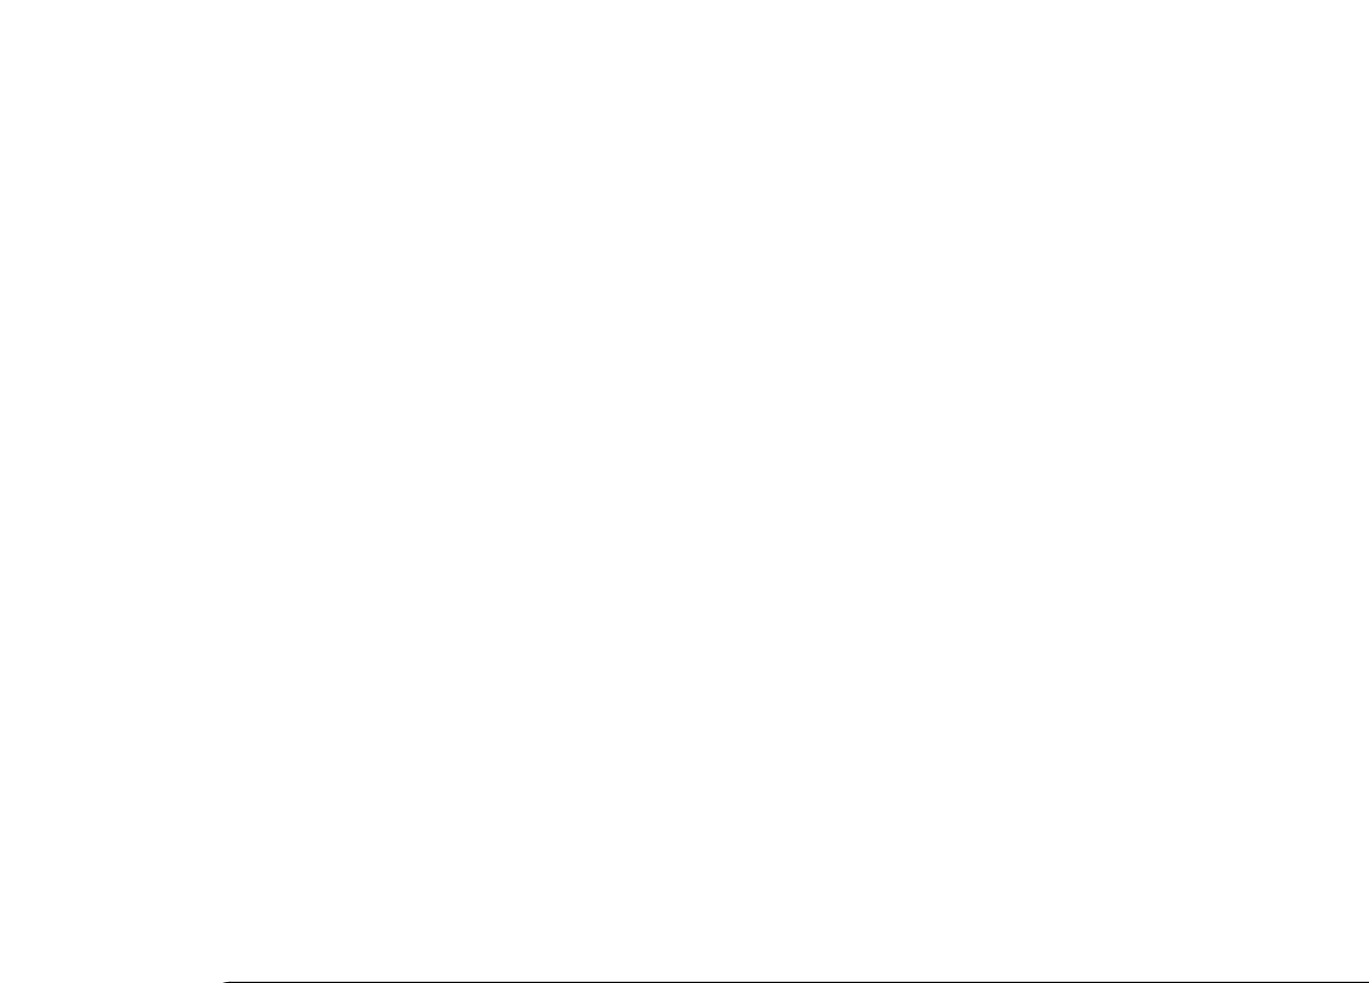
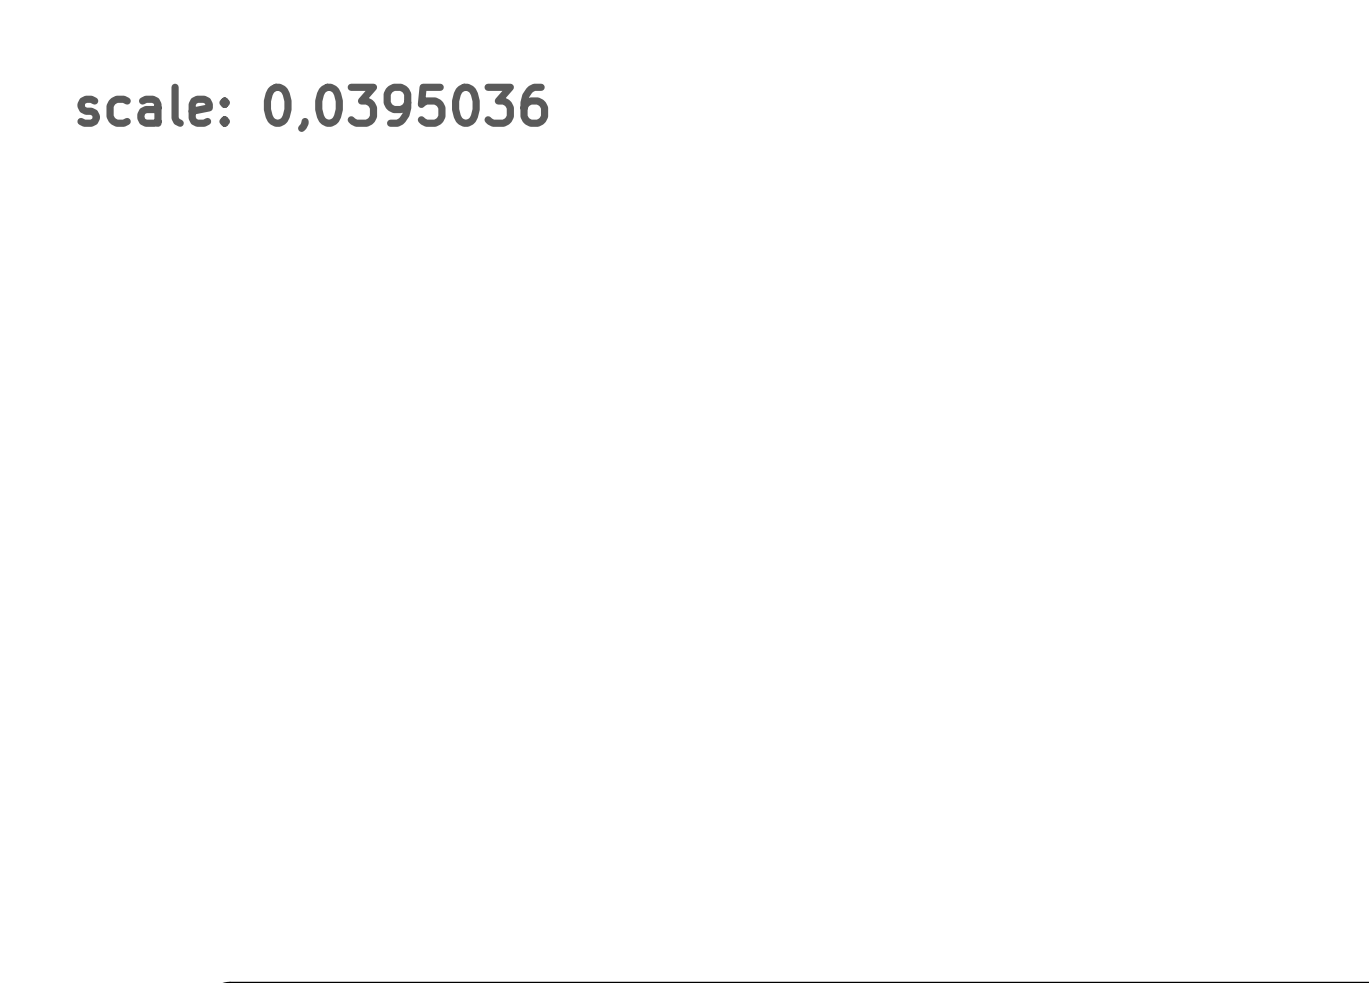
text: none -> scale: 0,0395036 (312, 107)

